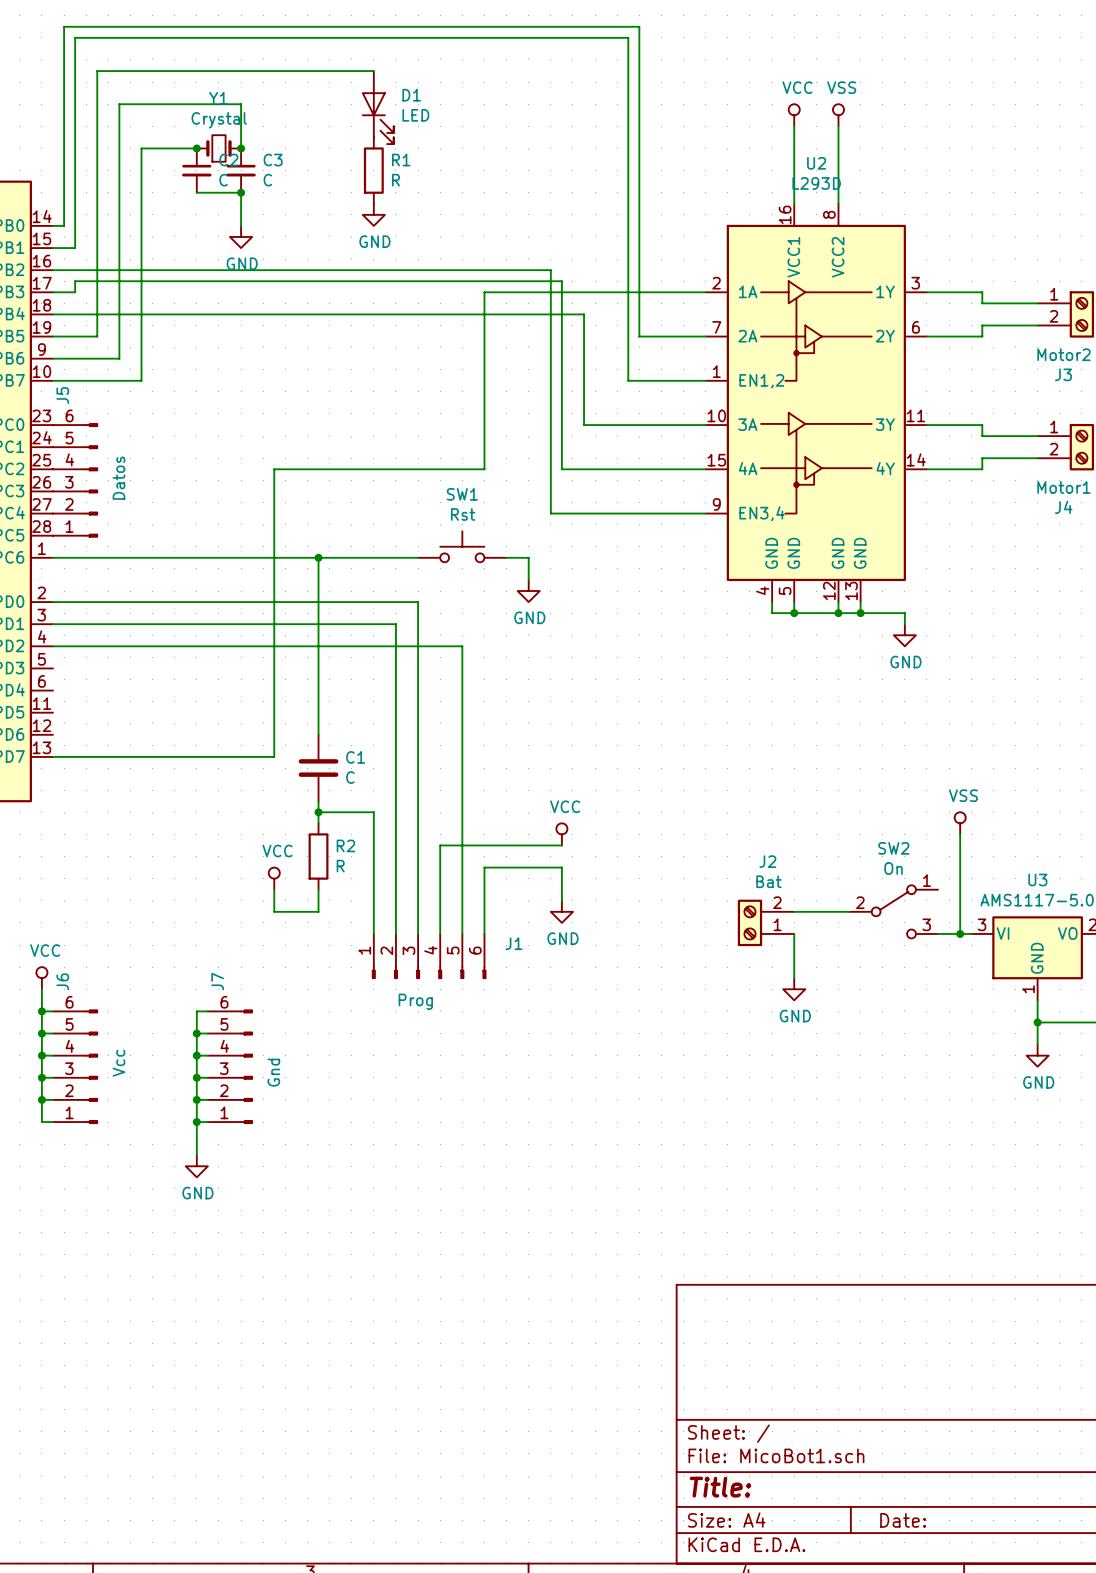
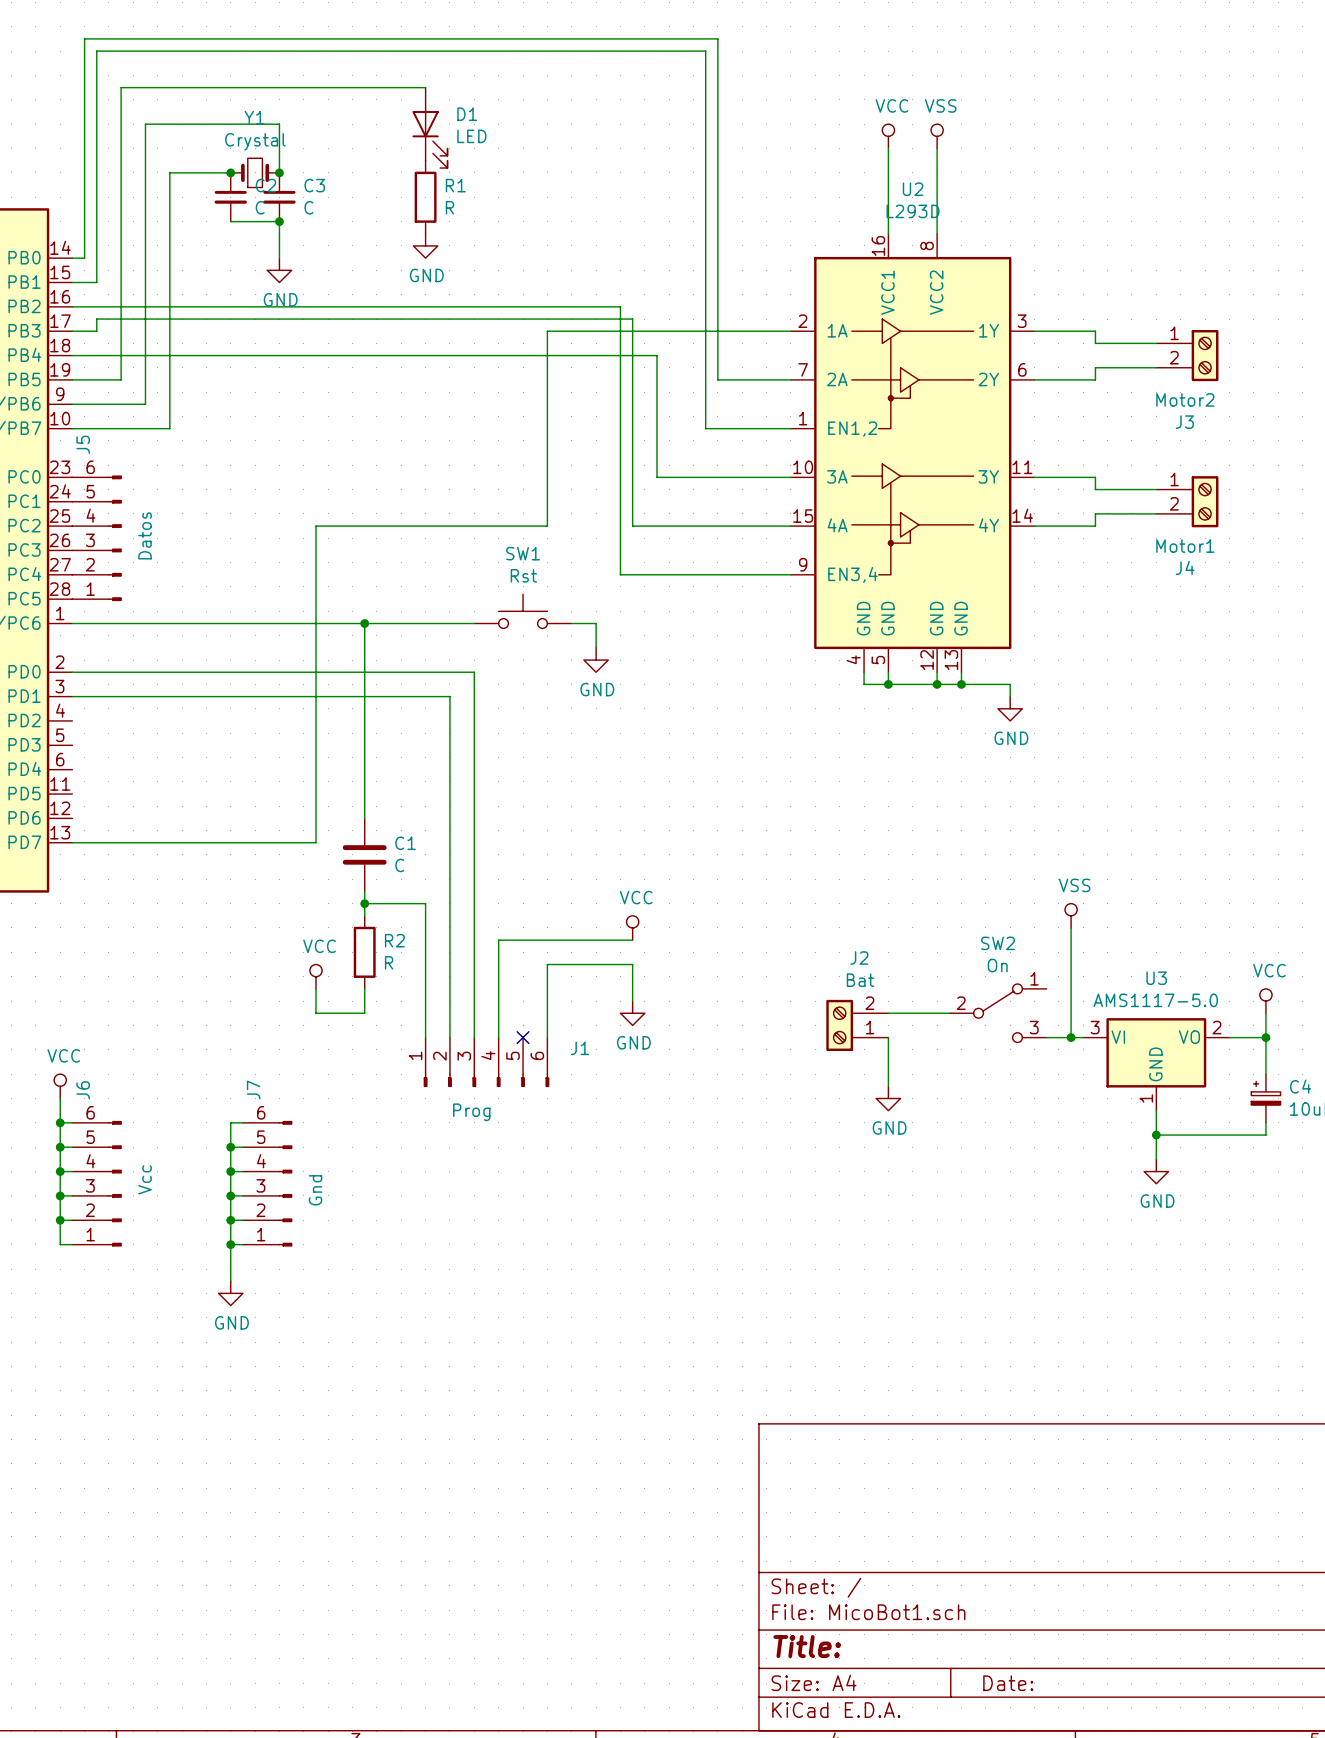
wire: (53, 646) (462, 646) (462, 933) -> none
no-connect mark: none -> (523, 1037)

